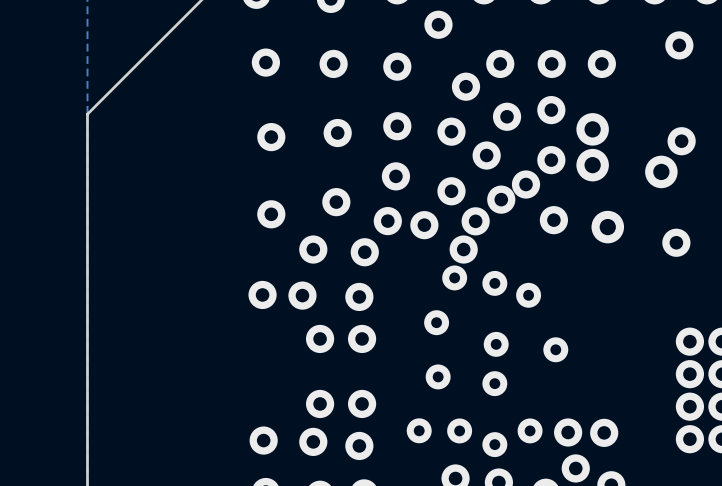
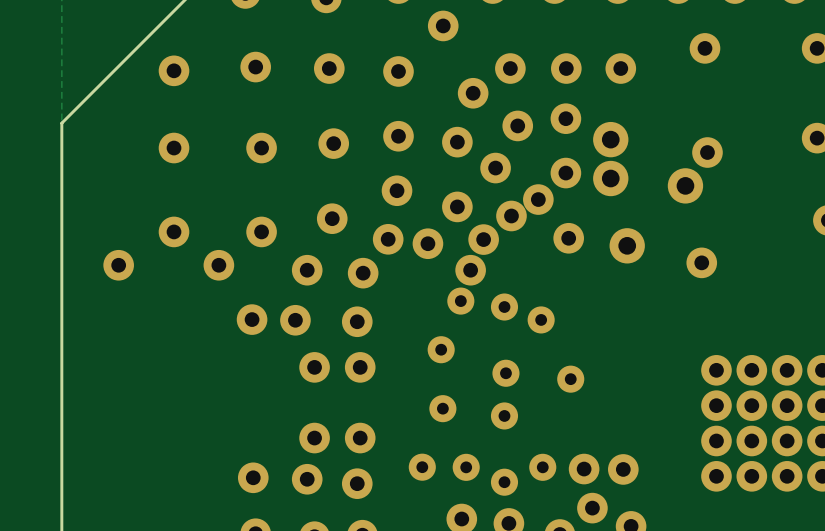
via: none -> (174, 70)
via: none -> (174, 148)
via: none -> (174, 231)
via: none -> (118, 265)
via: none -> (218, 265)

